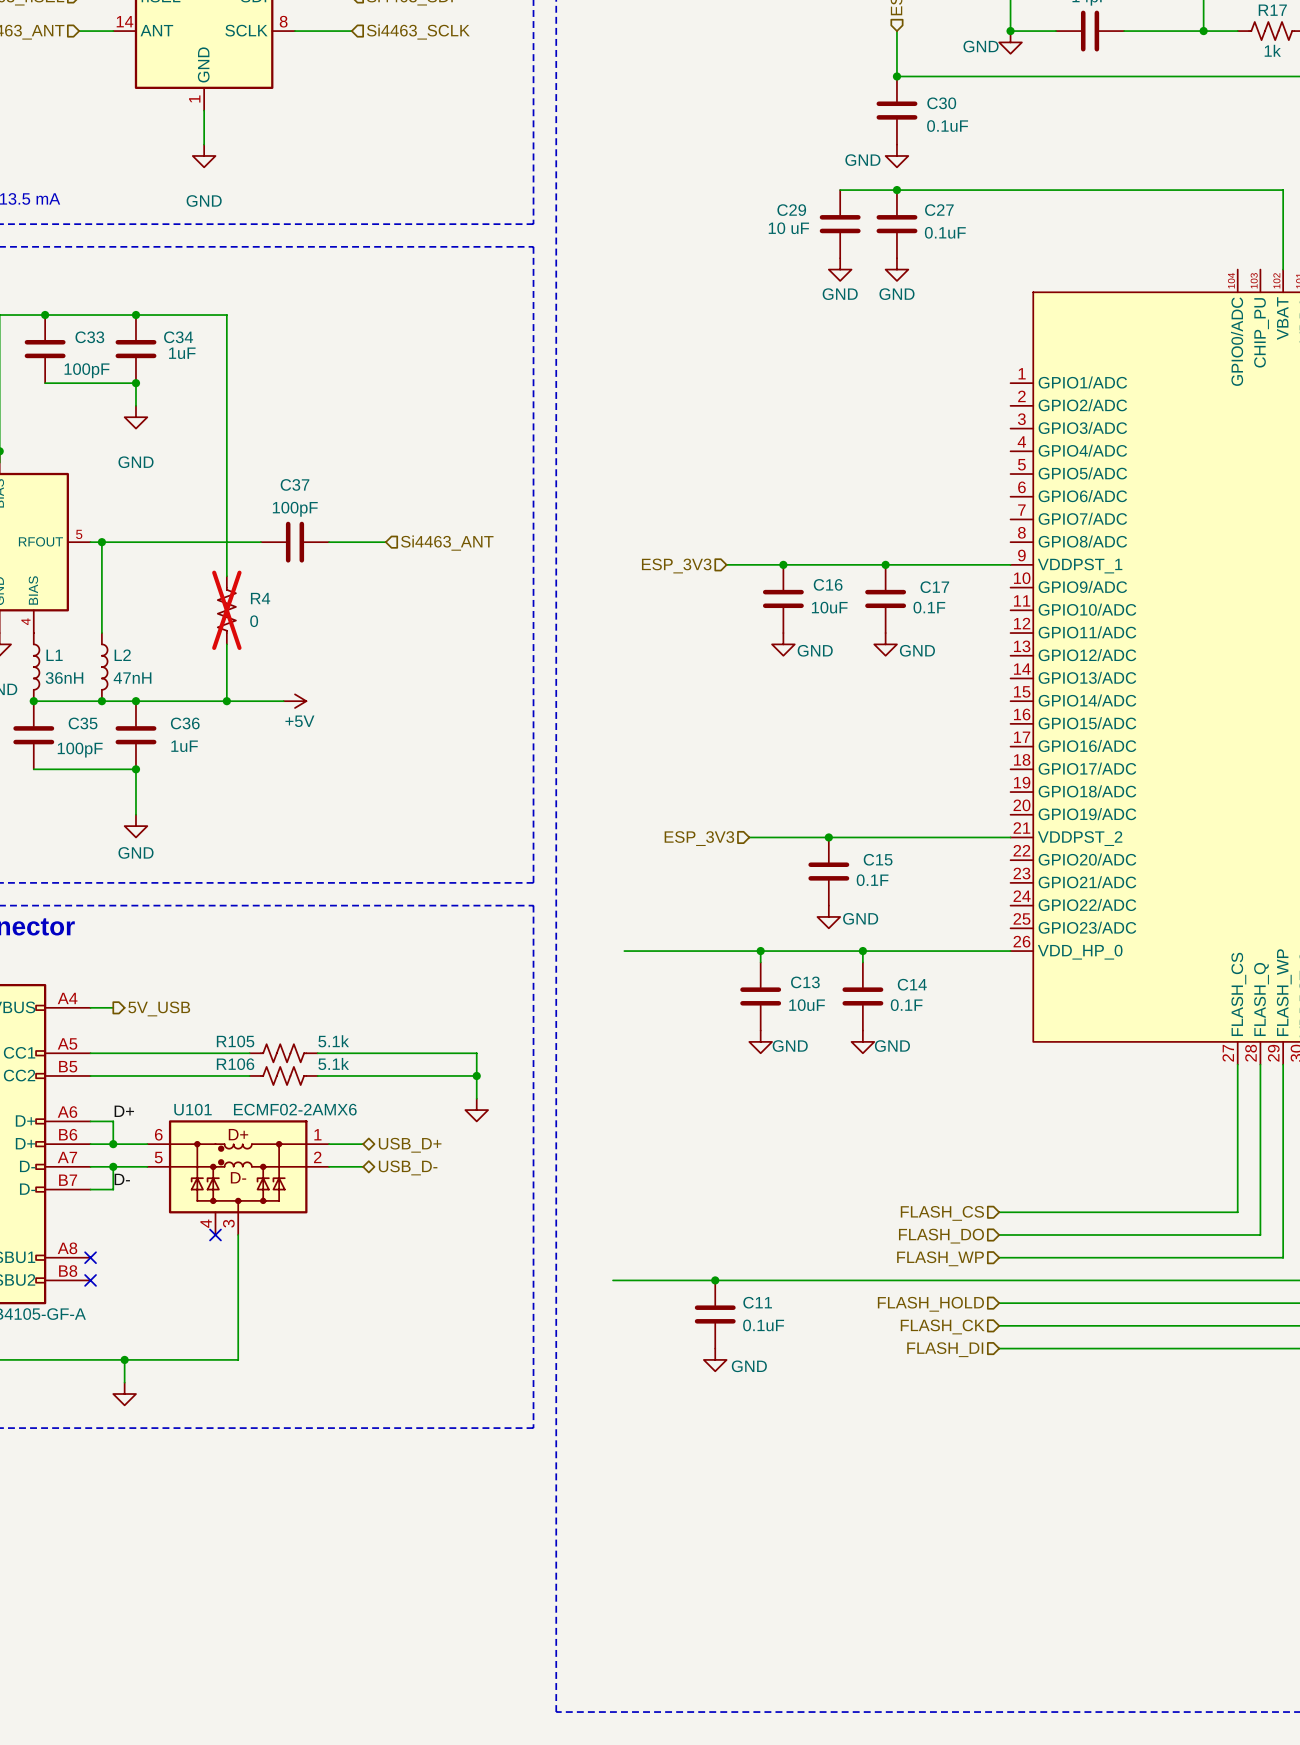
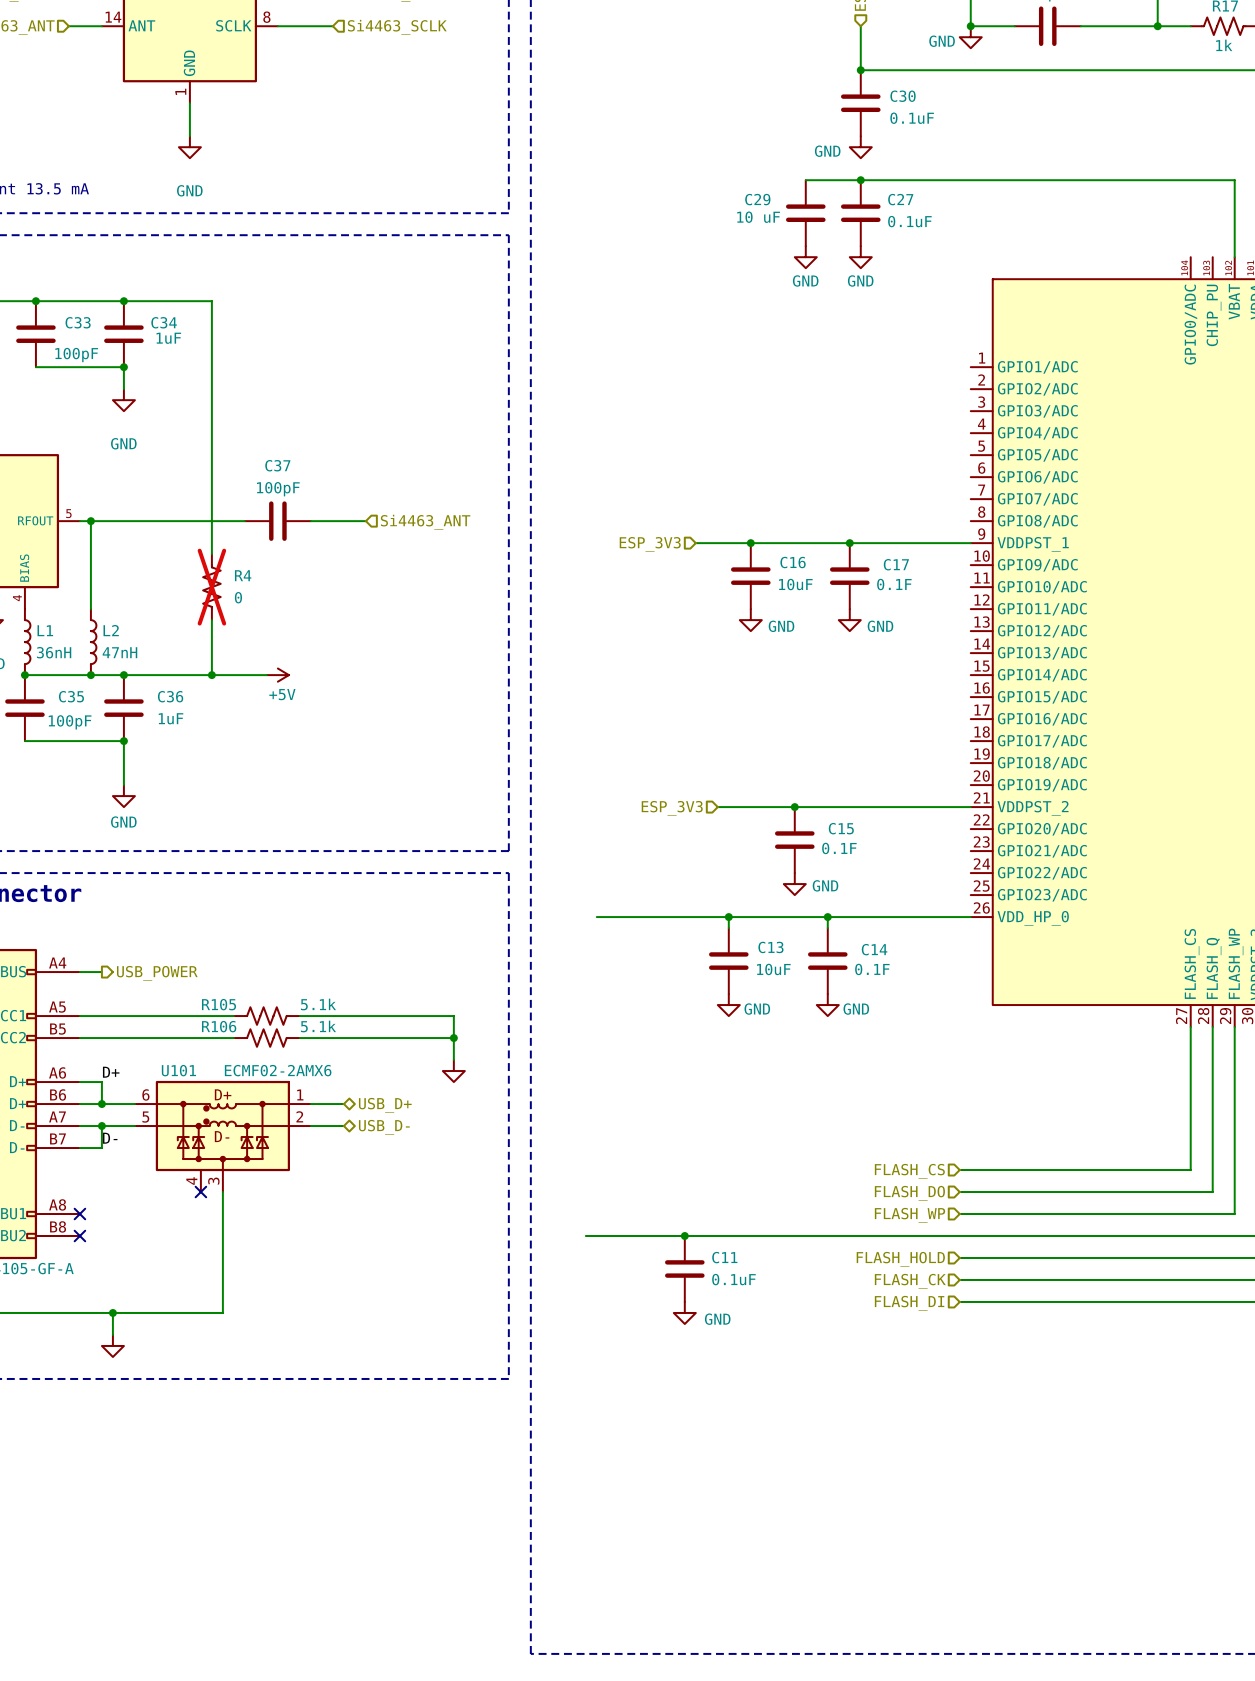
hierarchical label: 5V_USB (159, 1008) -> USB_POWER (157, 973)

